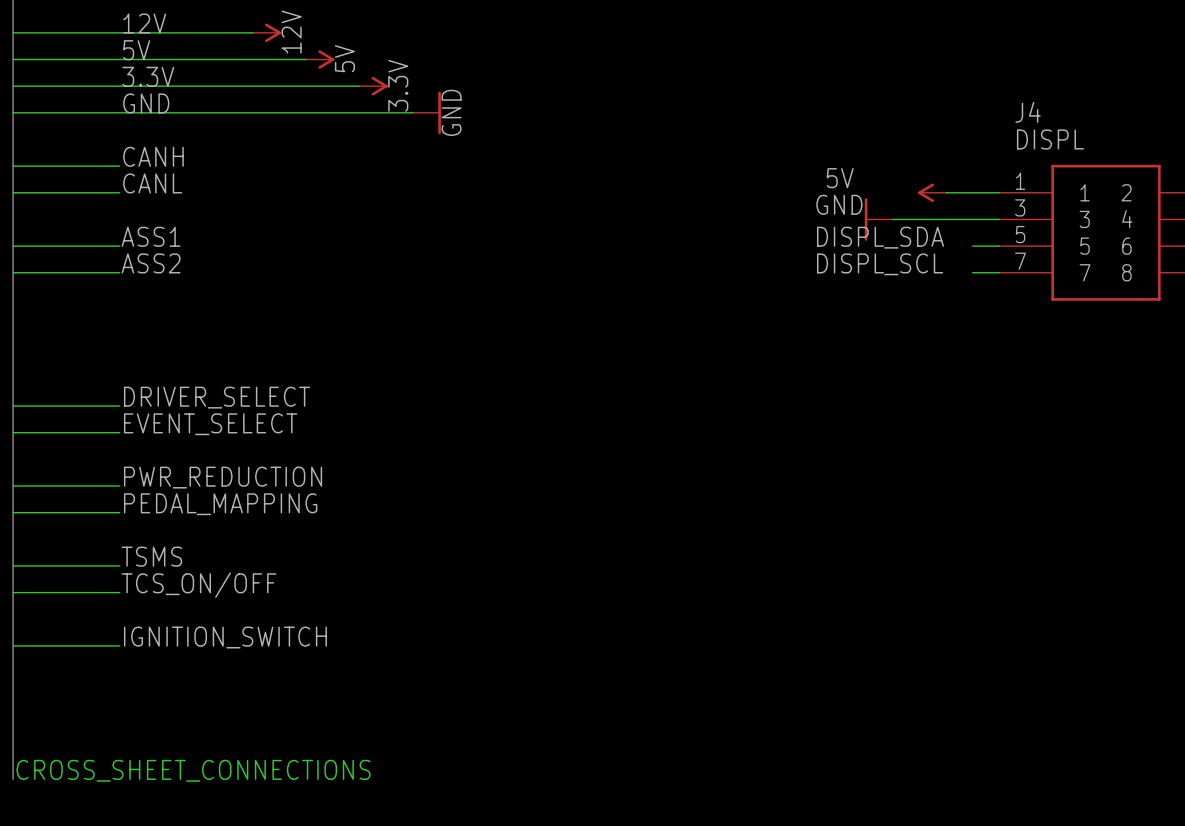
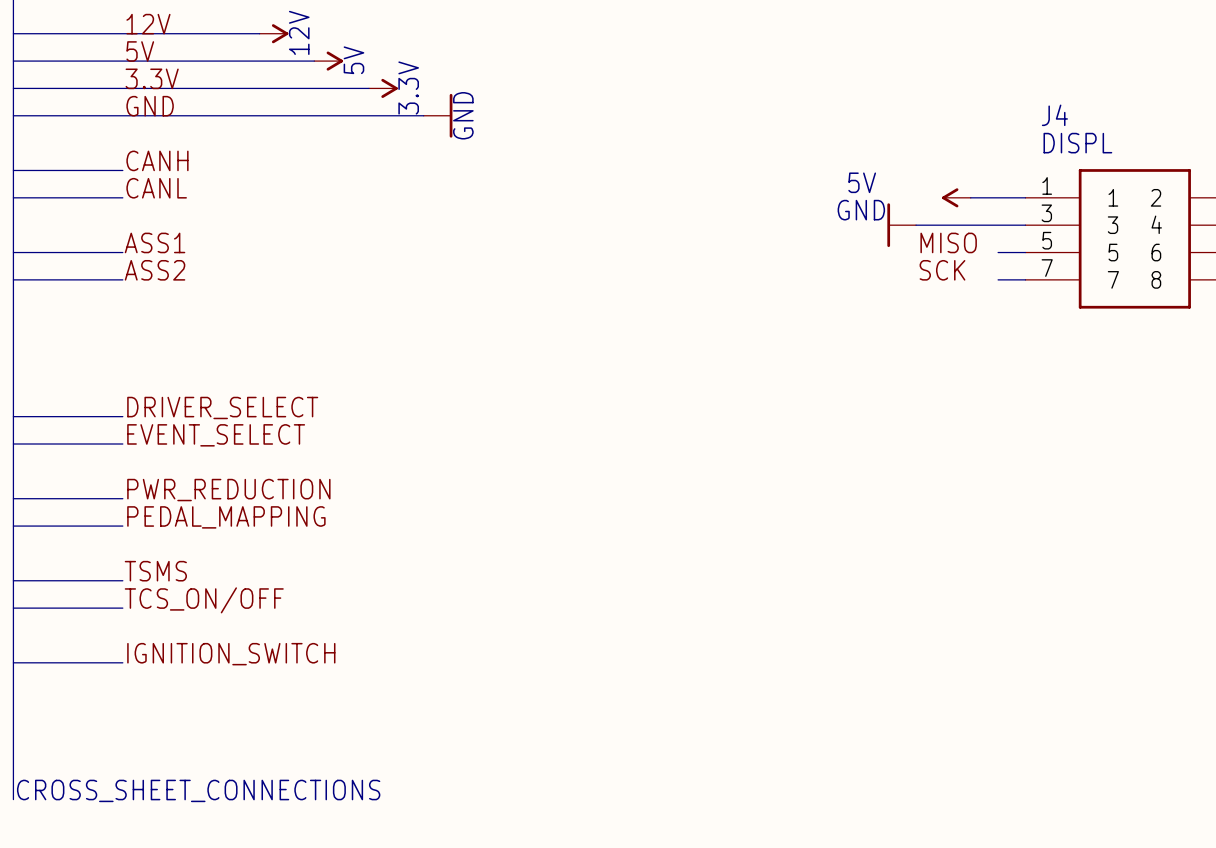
label: none -> MISO (948, 242)
label: DISPL_SDA (880, 237) -> none
label: none -> SCK (942, 270)
label: DISPL_SCL (880, 264) -> none

